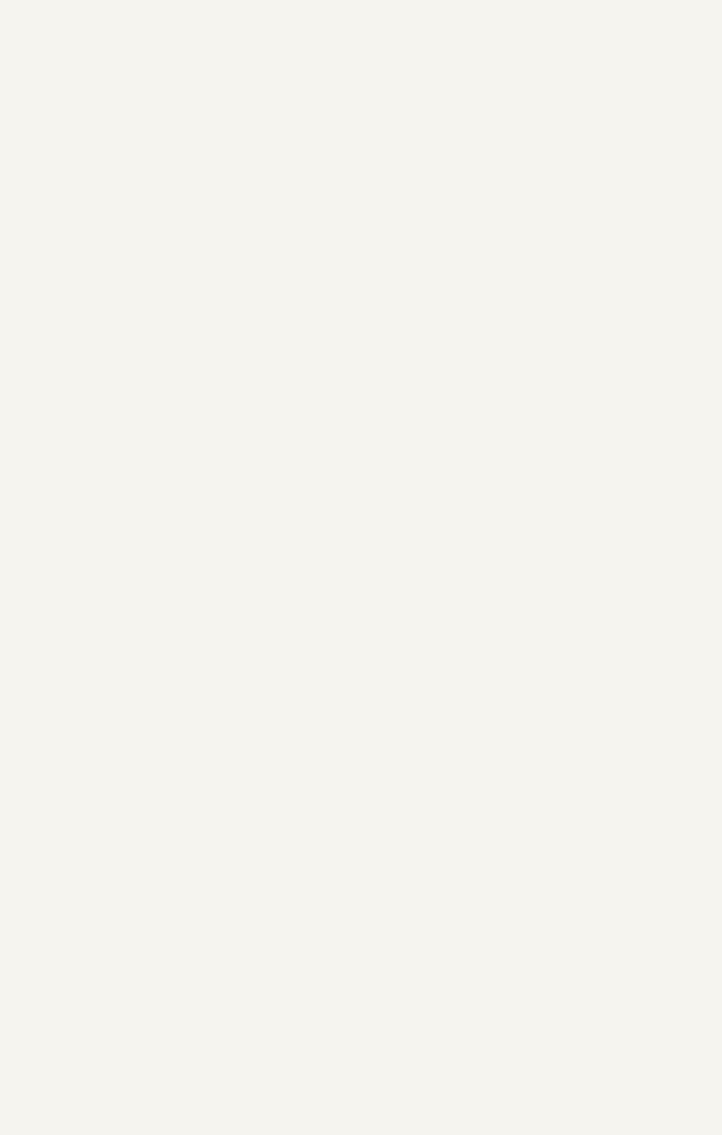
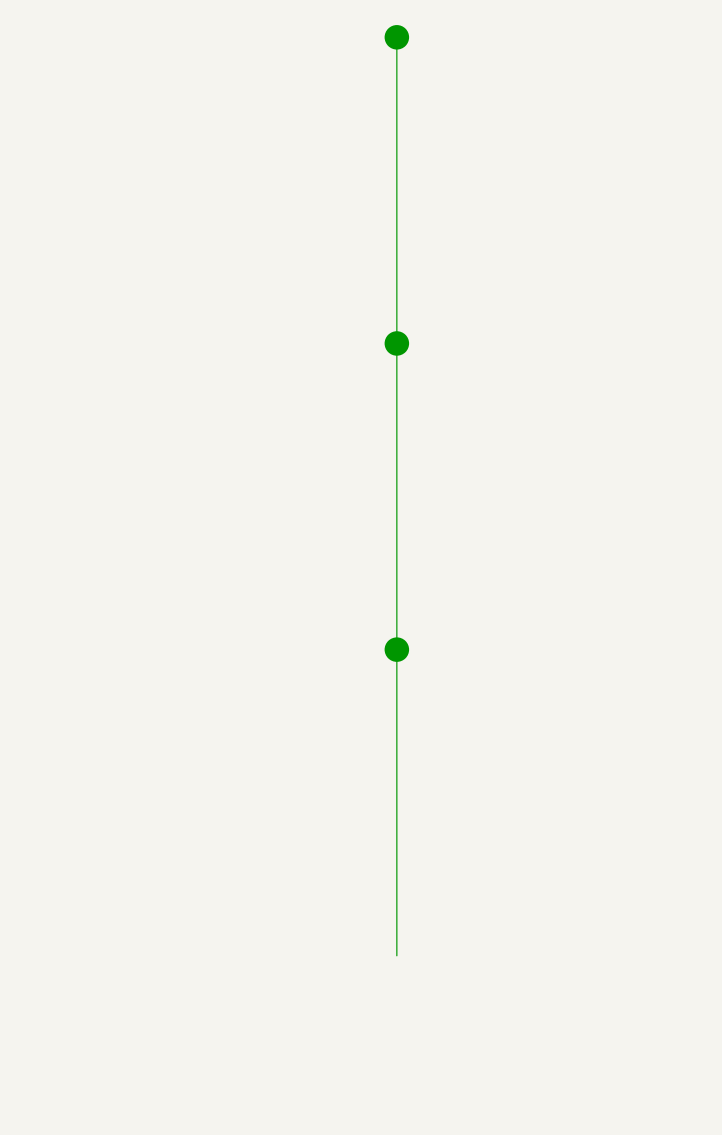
wire: none -> (396, 37) (396, 955)
junction: none -> (396, 37)
junction: none -> (396, 343)
junction: none -> (396, 649)

